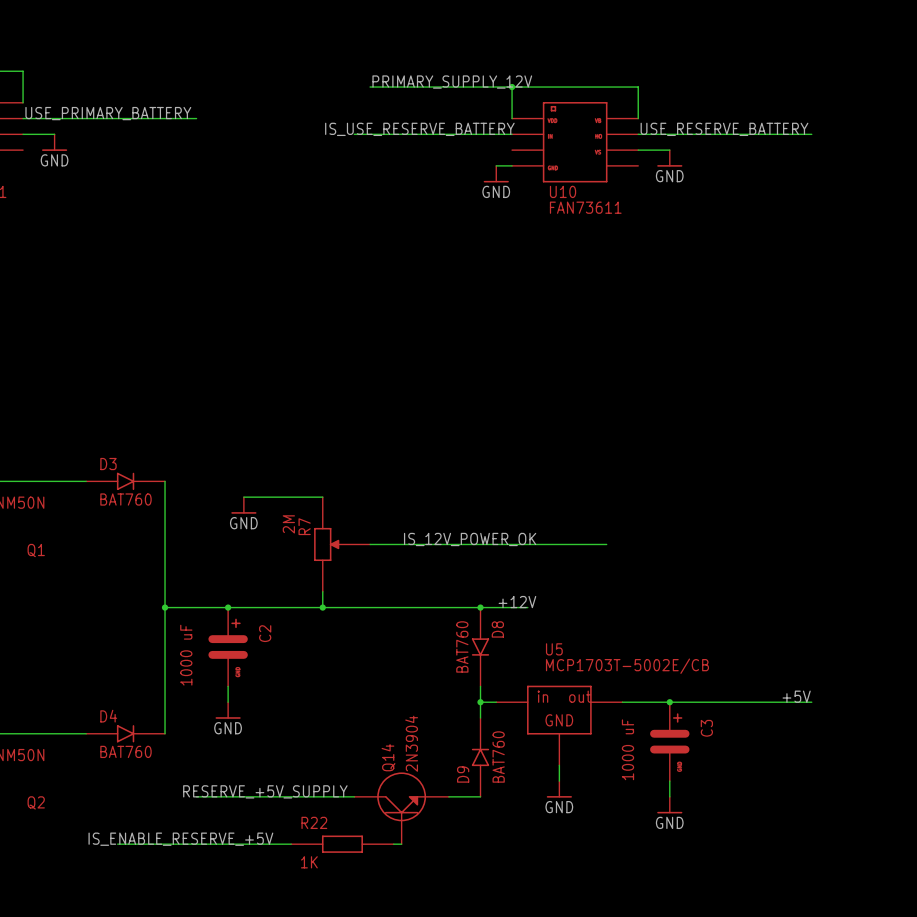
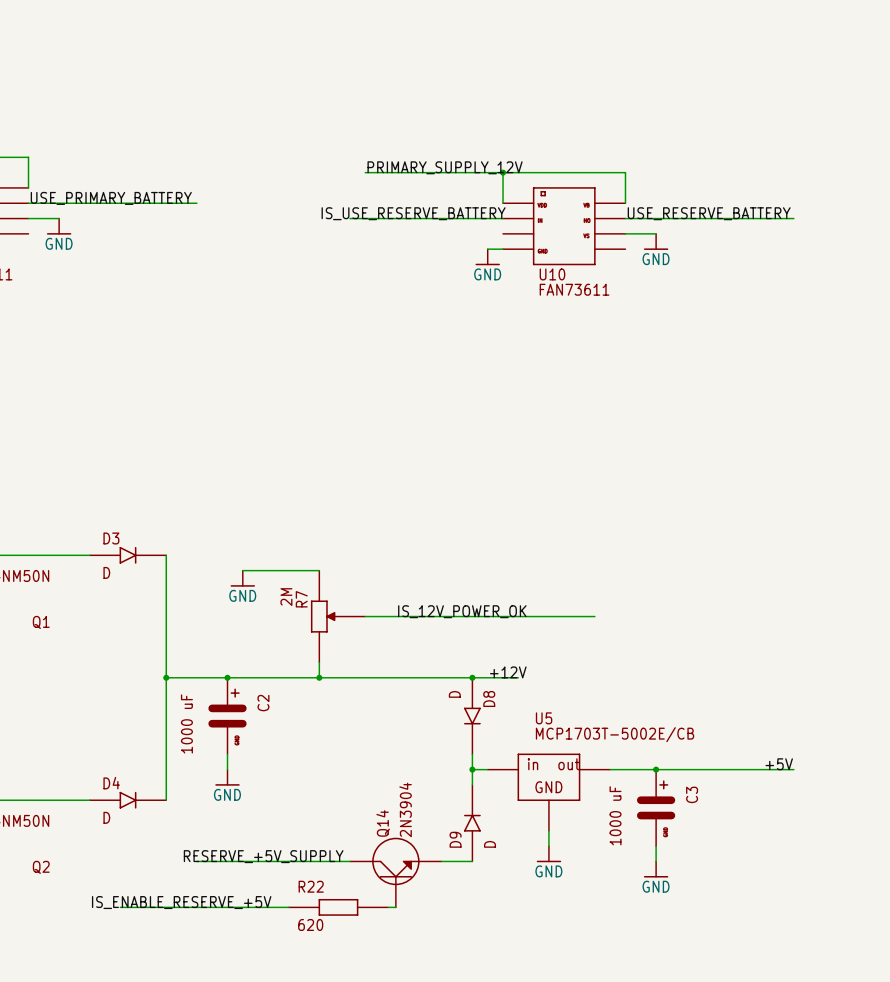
D3 value: BAT760 (126, 499) -> D (106, 572)
D8 value: BAT760 (462, 646) -> D (454, 694)
D4 value: BAT760 (126, 751) -> D (106, 817)
D9 value: BAT760 (498, 757) -> D (490, 844)
R22 value: 1K (309, 862) -> 620 (310, 924)

